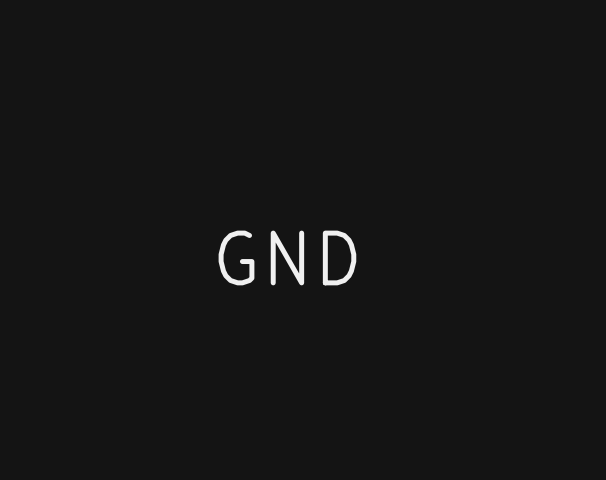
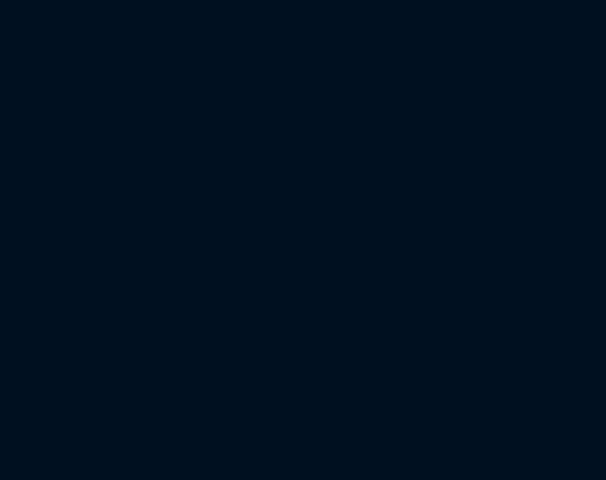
text: GND (287, 257) -> none

